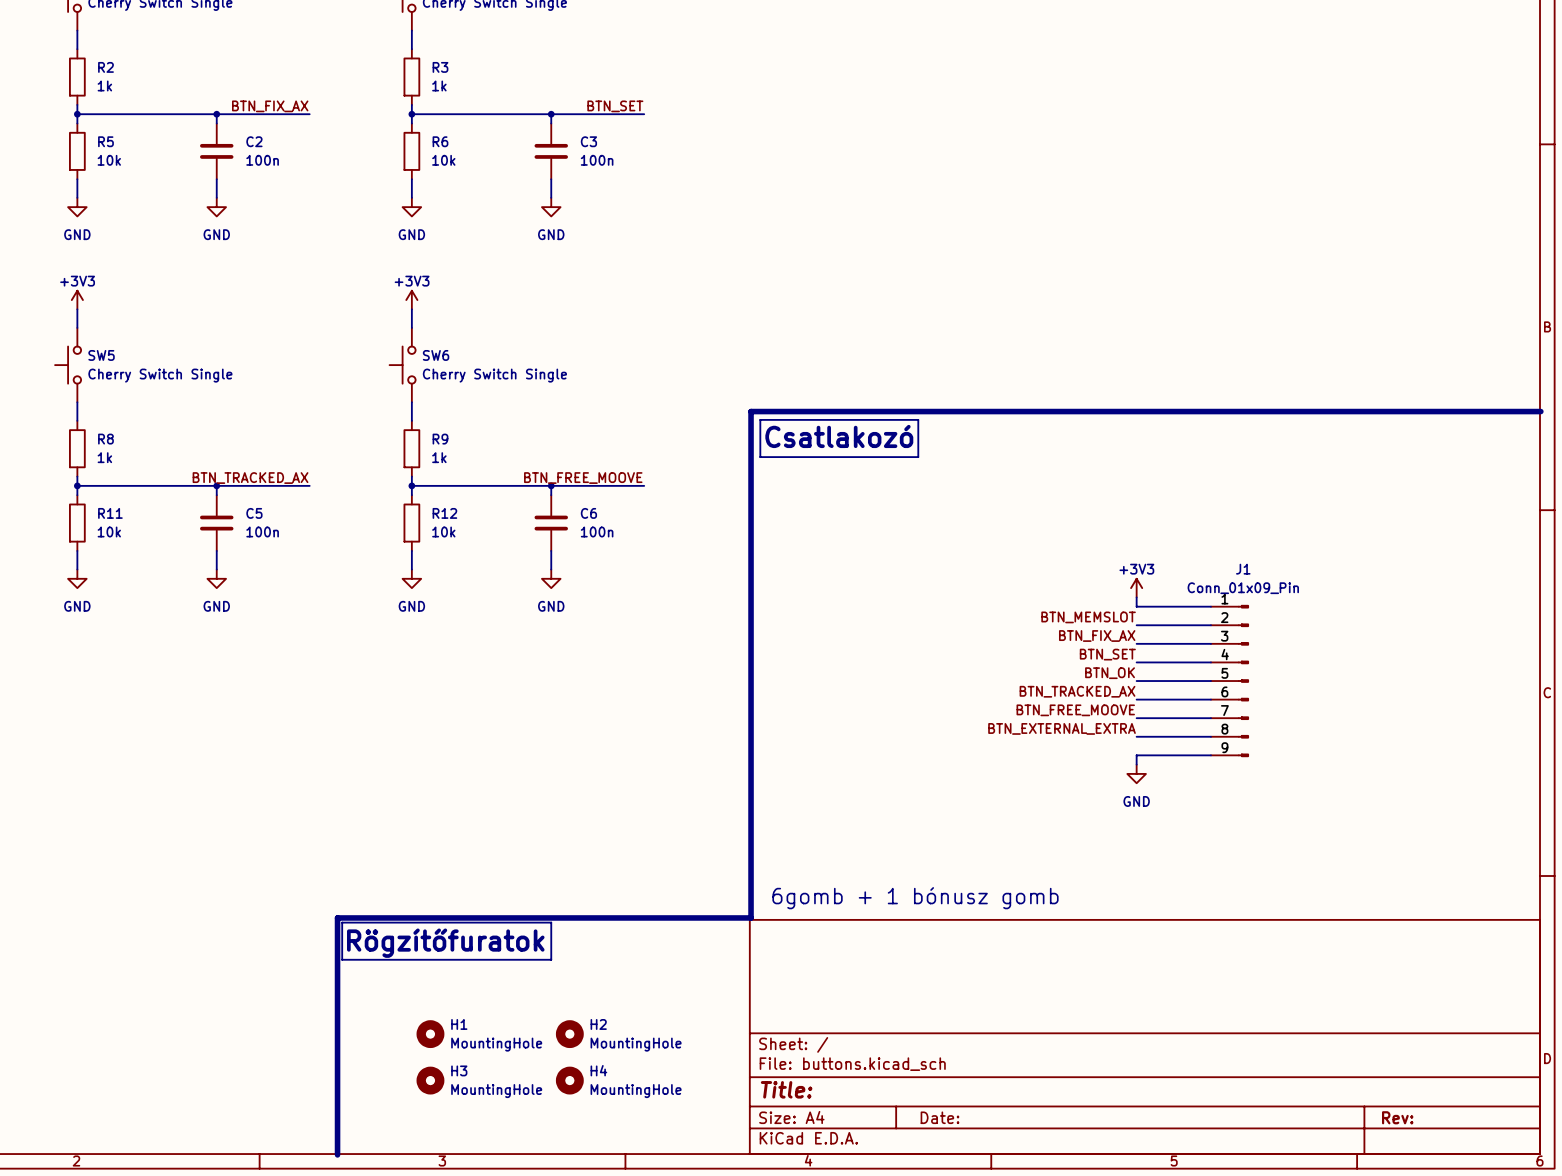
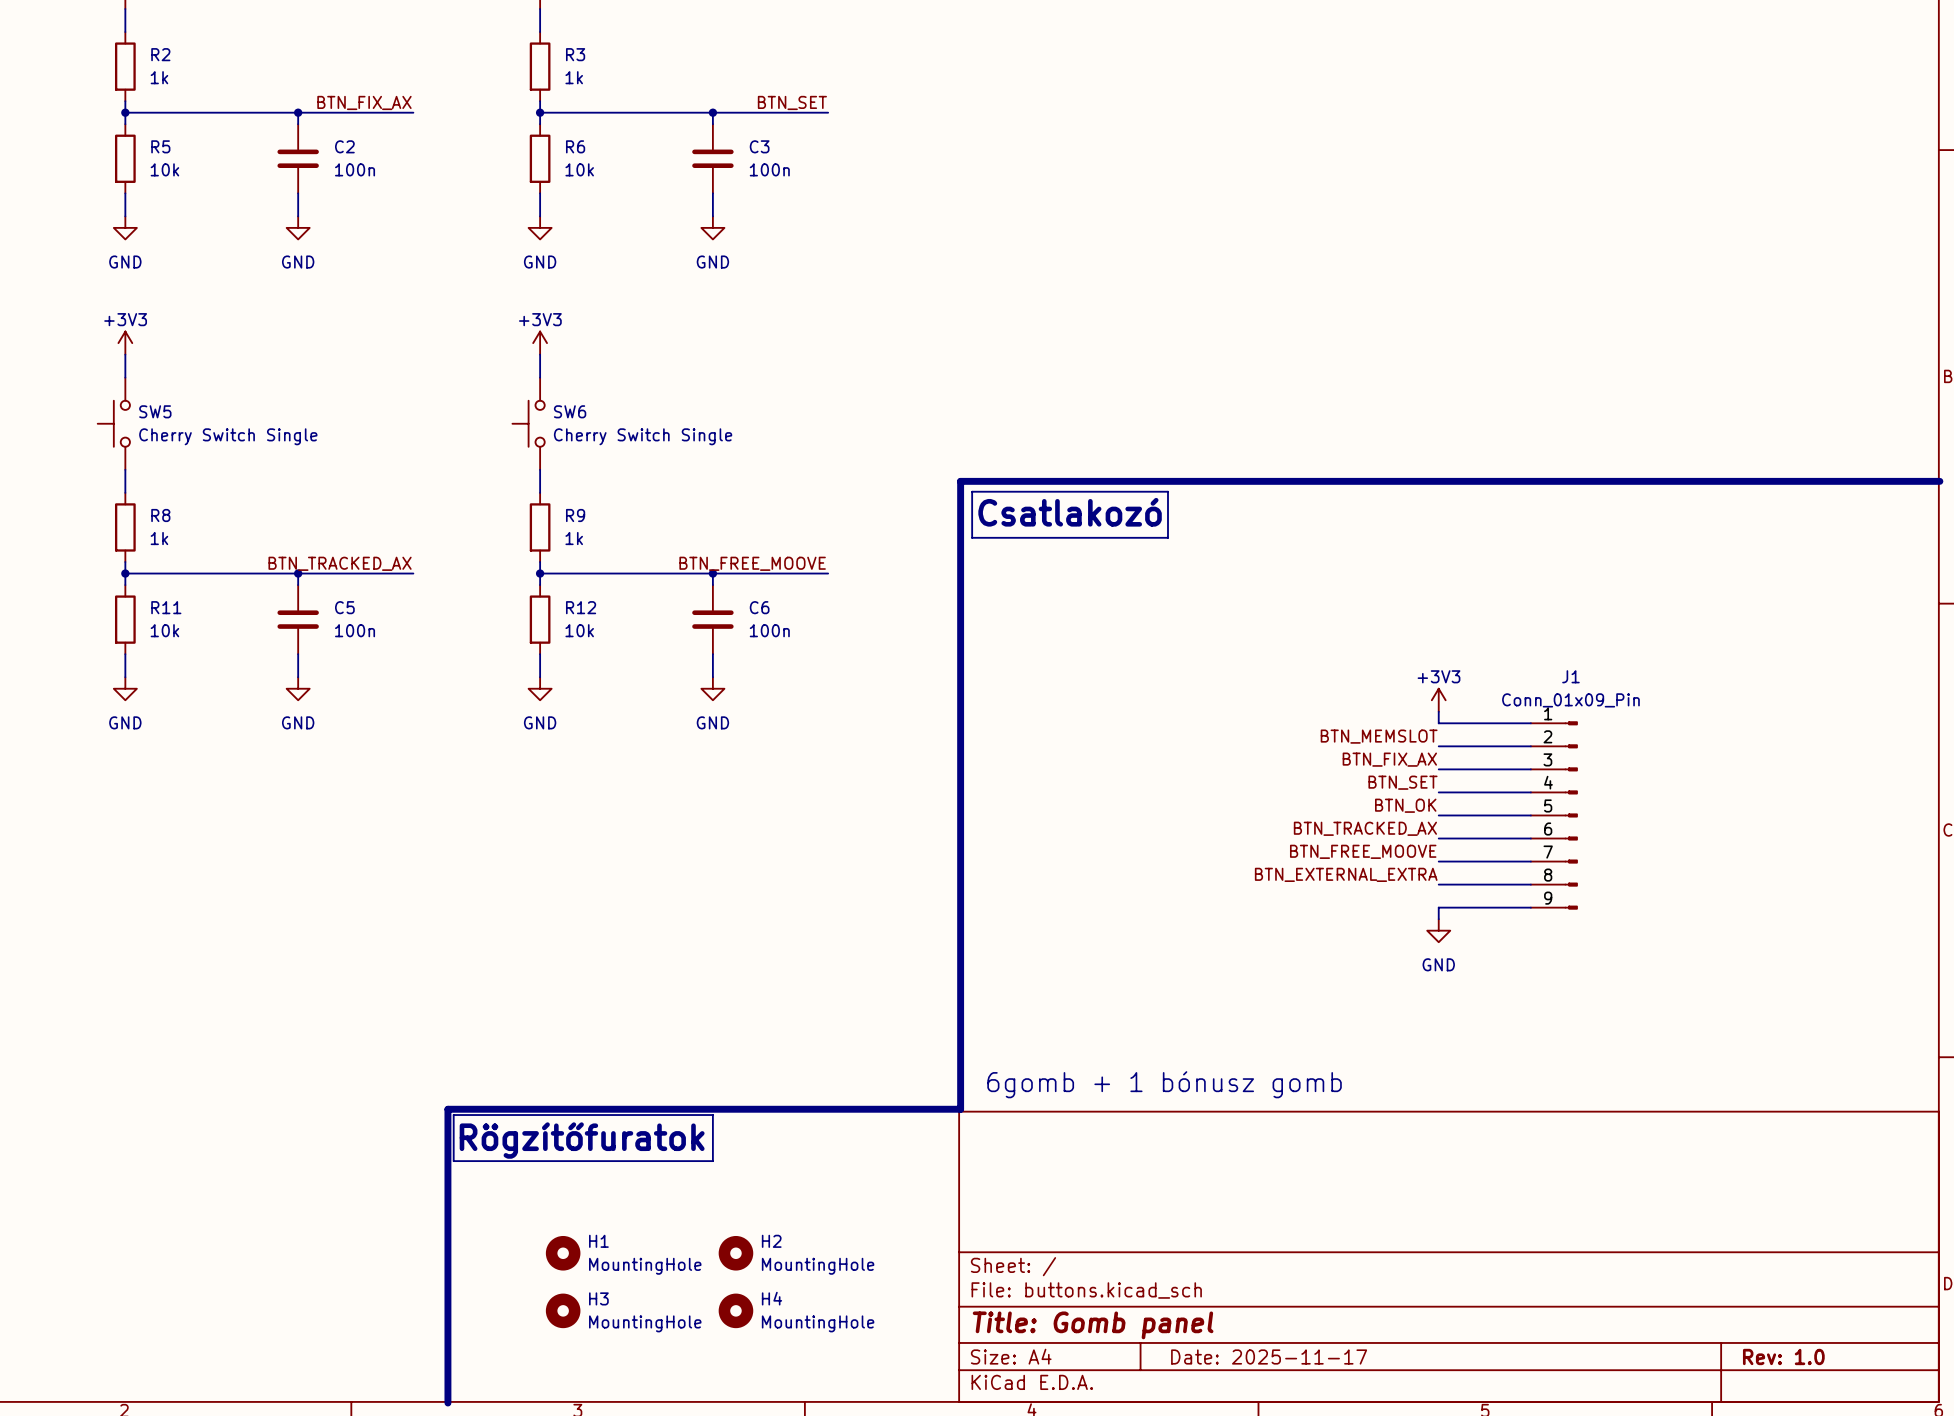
title block: Title: (786, 1089) -> Title: Gomb panel (1093, 1325)
title block: Date: (940, 1117) -> Date: 2025-11-17 (1269, 1356)
title block: Rev: (1397, 1117) -> Rev: 1.0 (1783, 1356)

